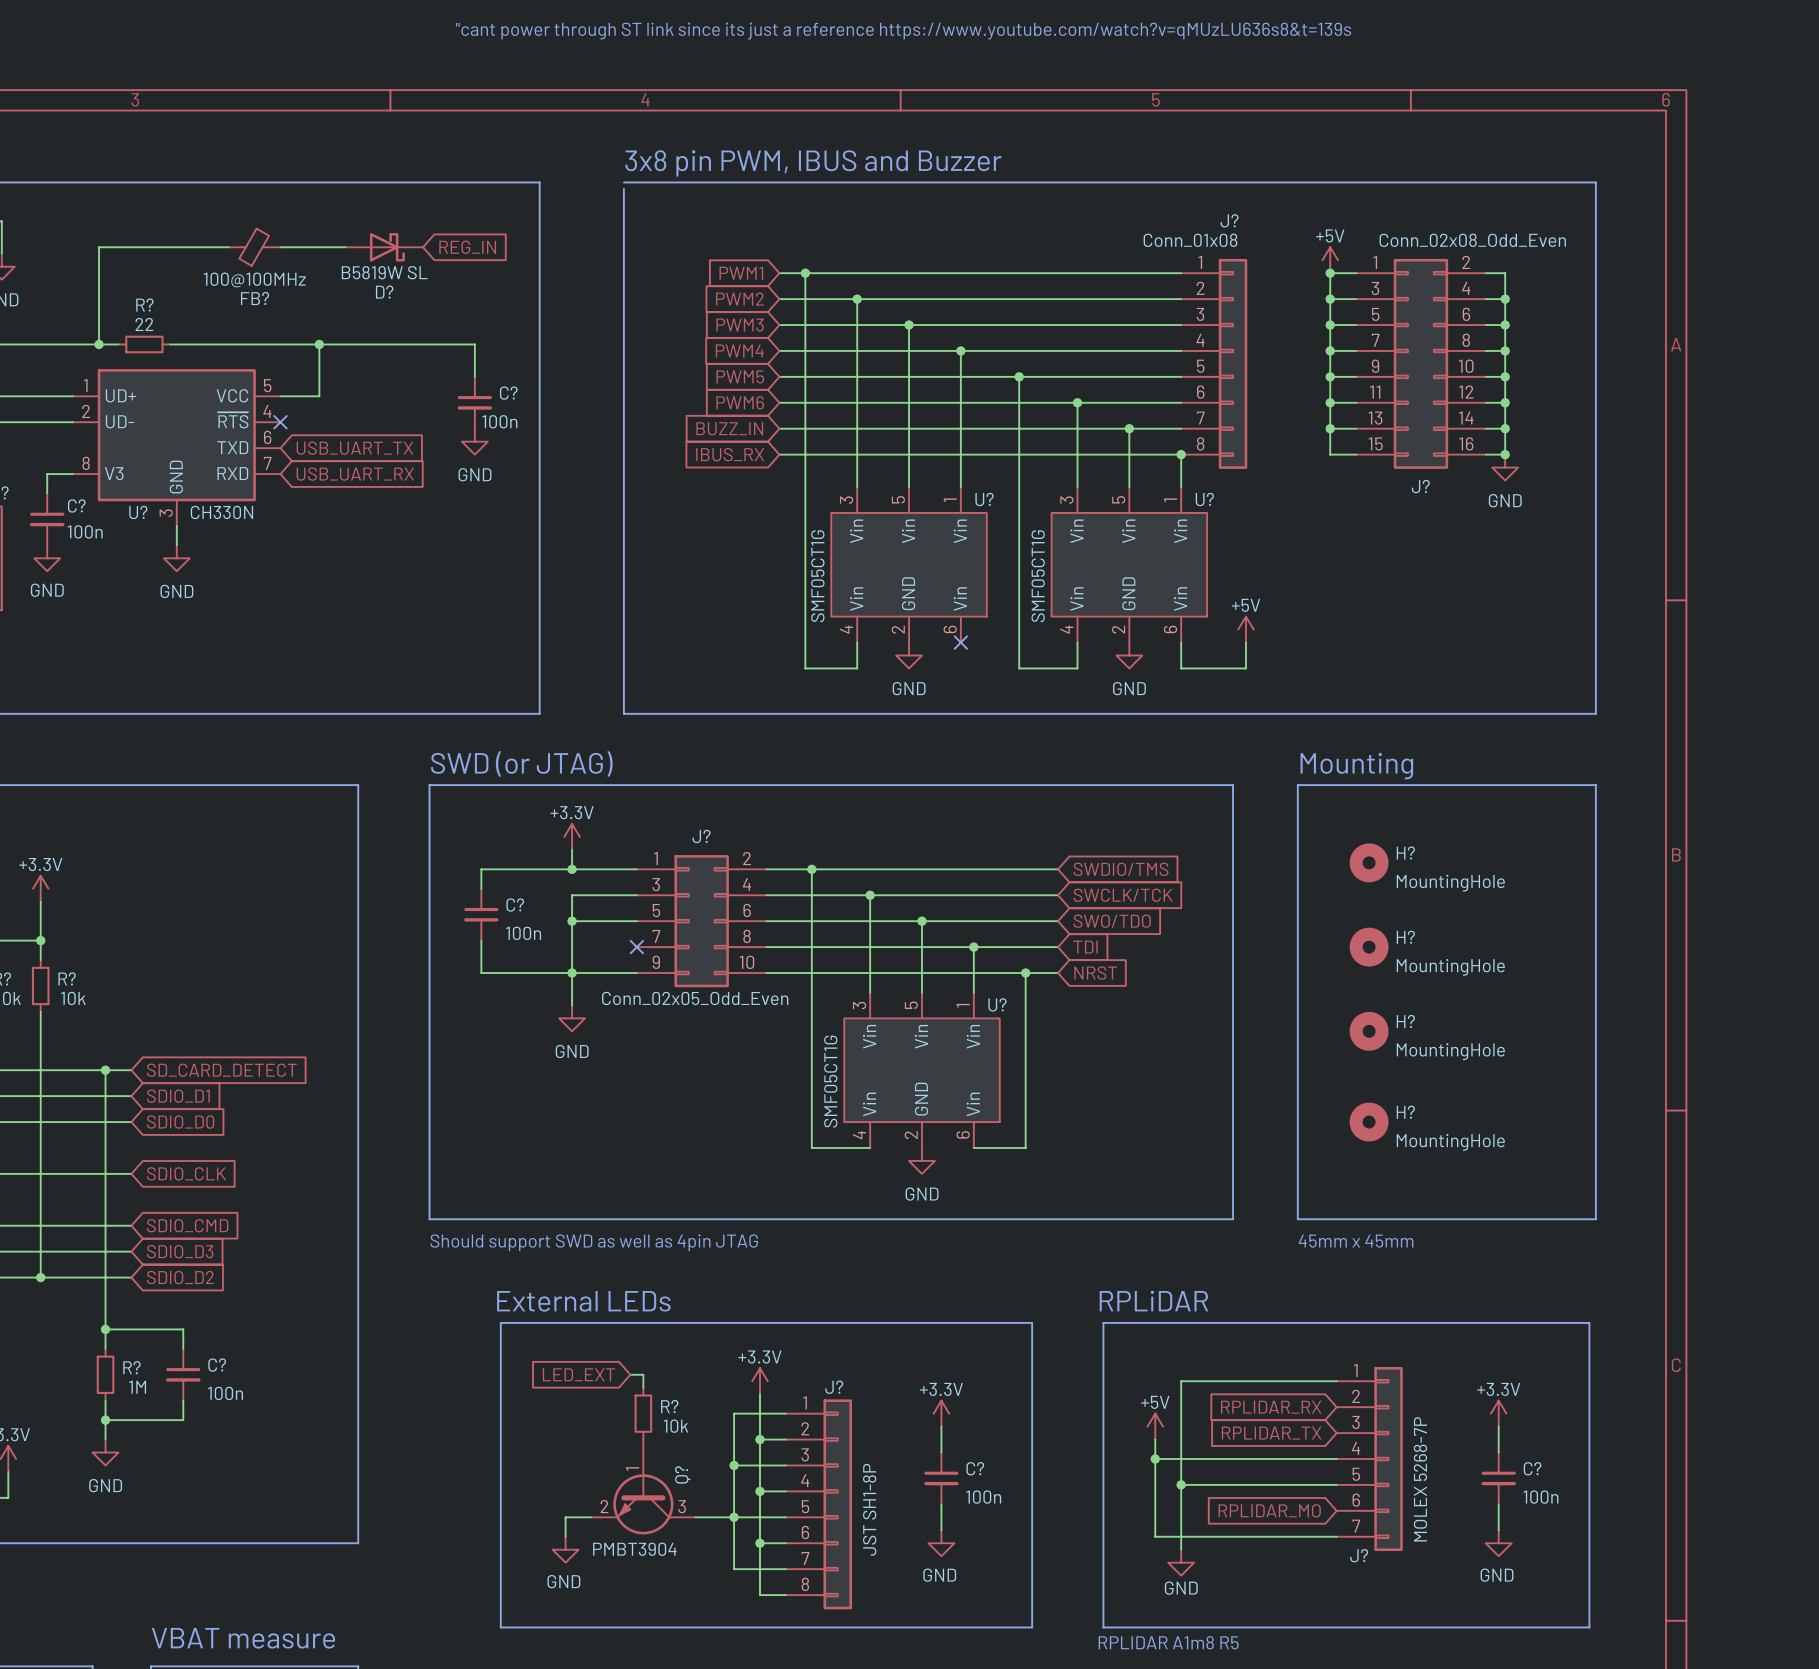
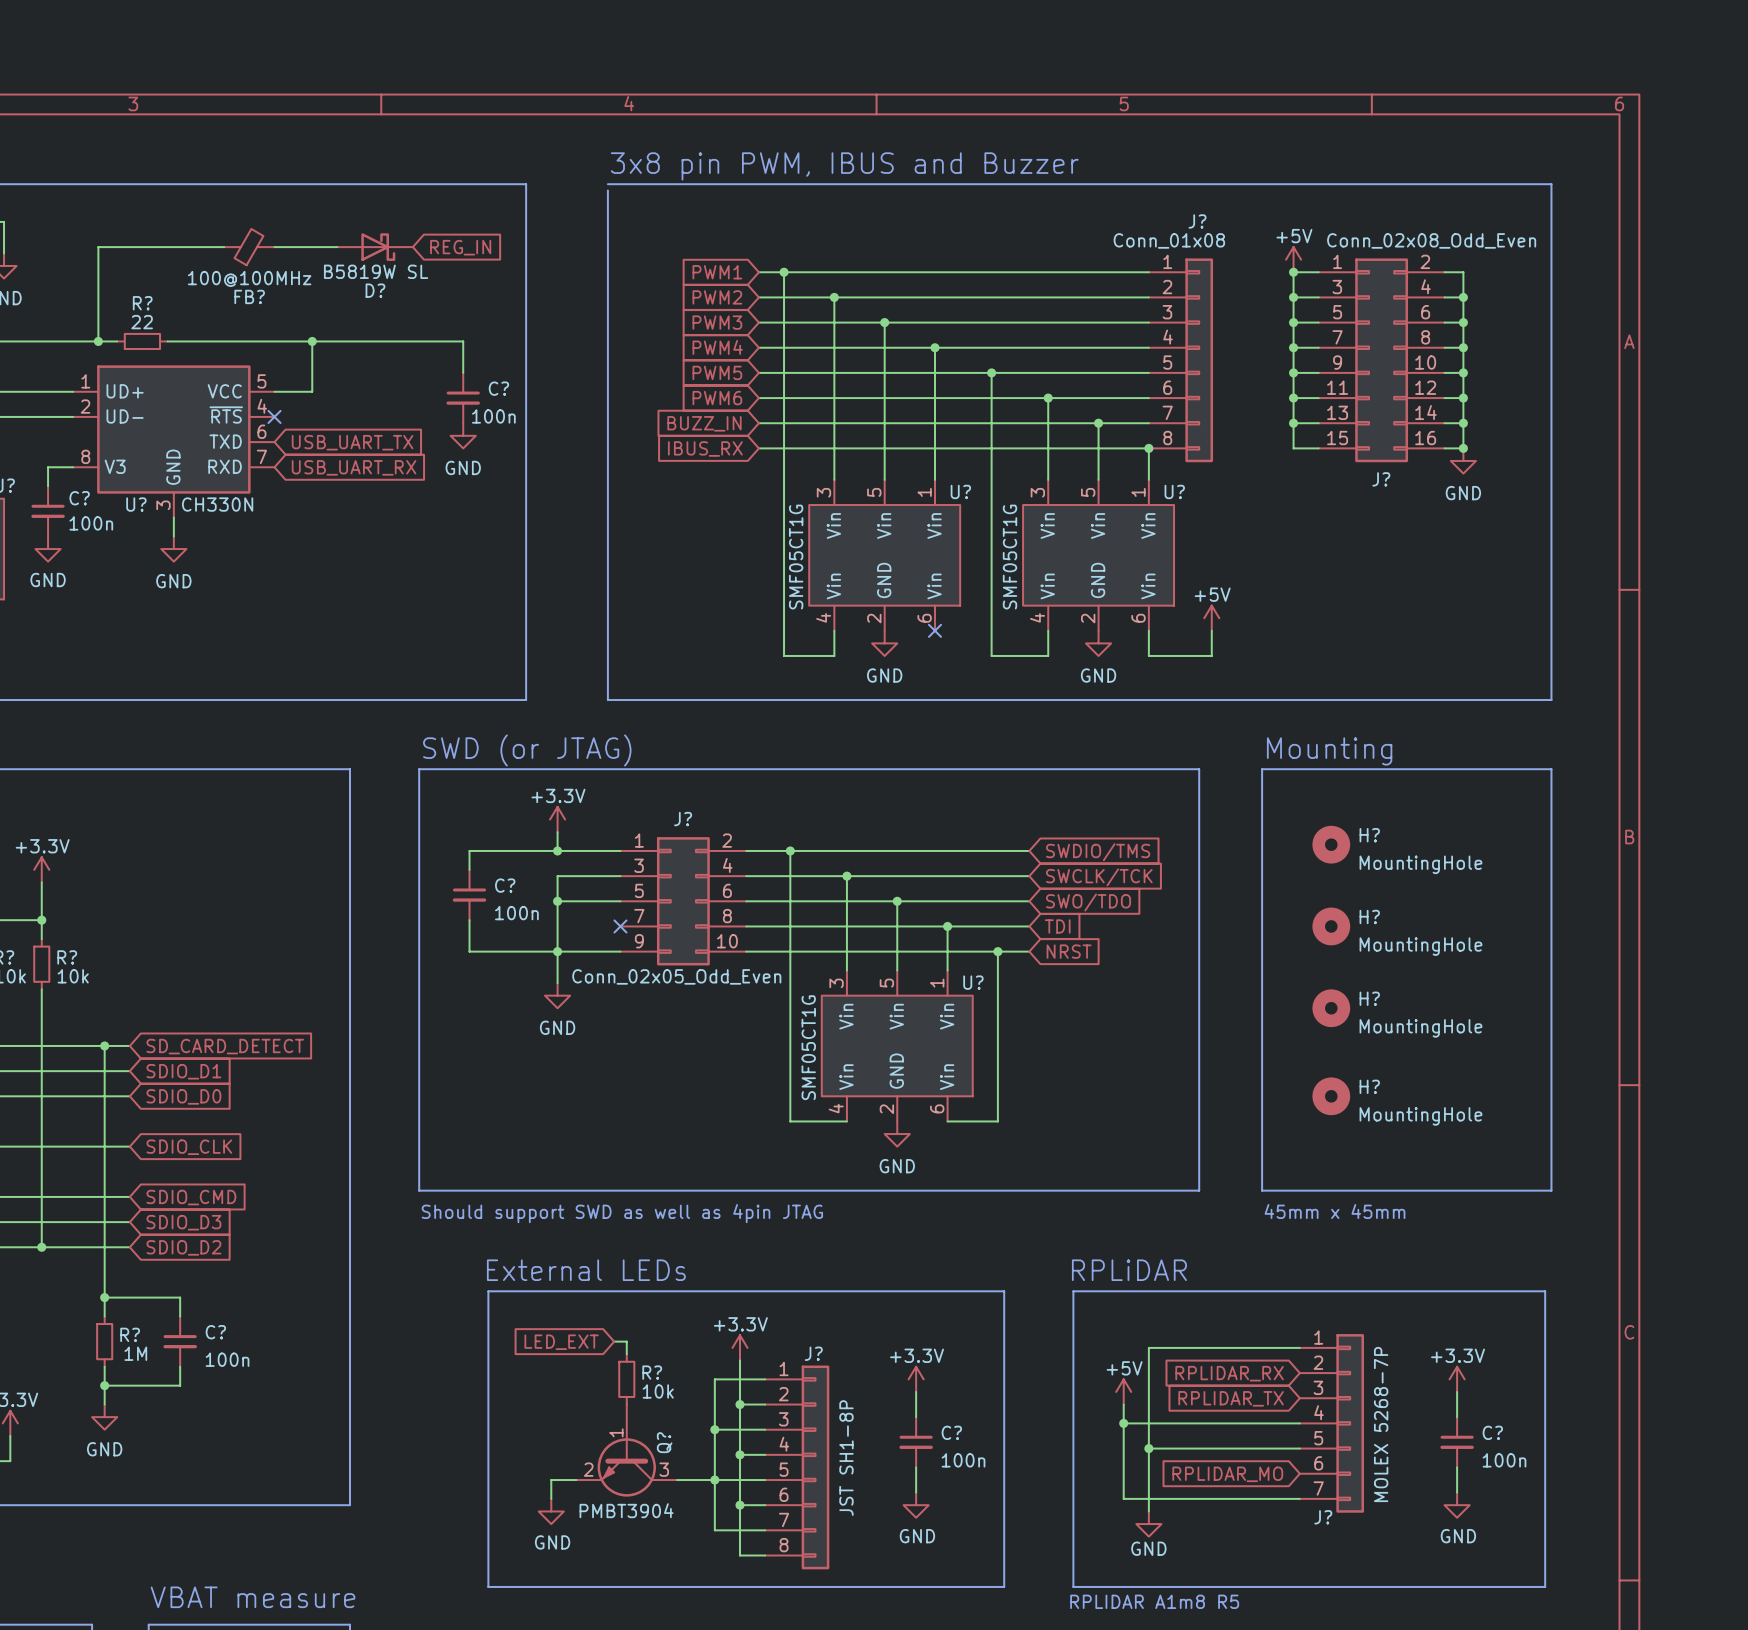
text: "cant power through ST link since its just a reference https://www.youtube.com/watch?v=qMUzLU636s8&t=139s (903, 31) -> none

